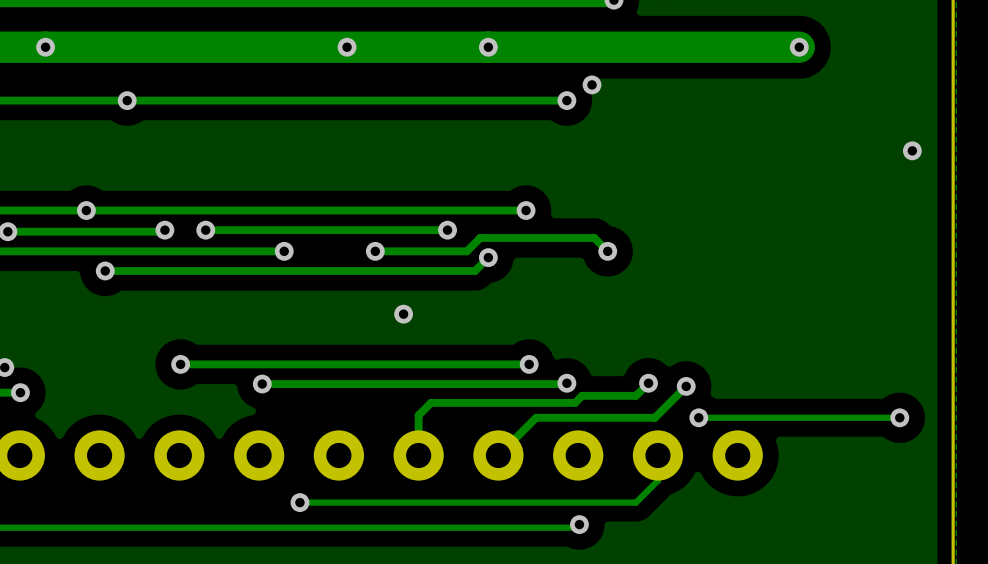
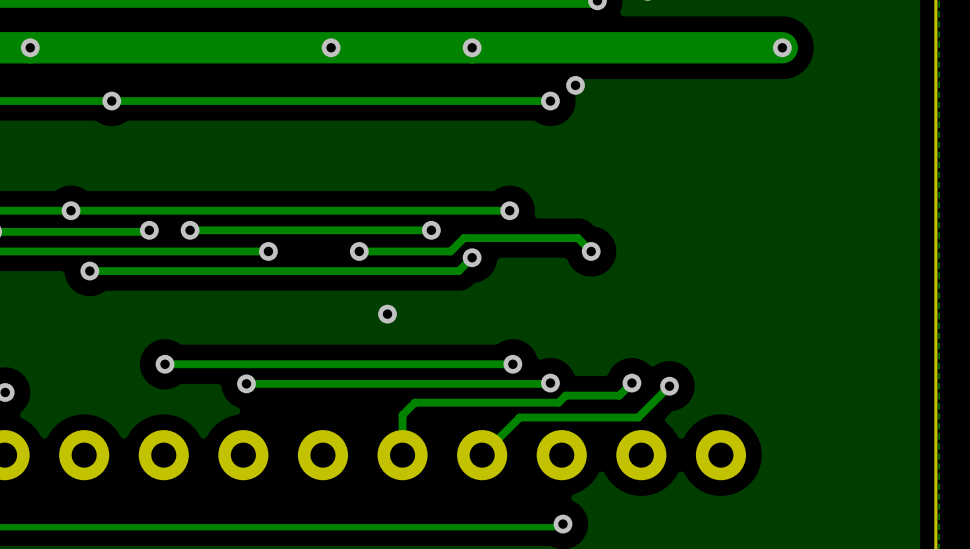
via: (912, 150) -> none
via: (698, 417) -> none
track: (899, 417) (698, 417) -> none
via: (899, 417) -> none
track: (657, 455) (657, 480) (635, 502) (299, 502) -> none
via: (299, 502) -> none

